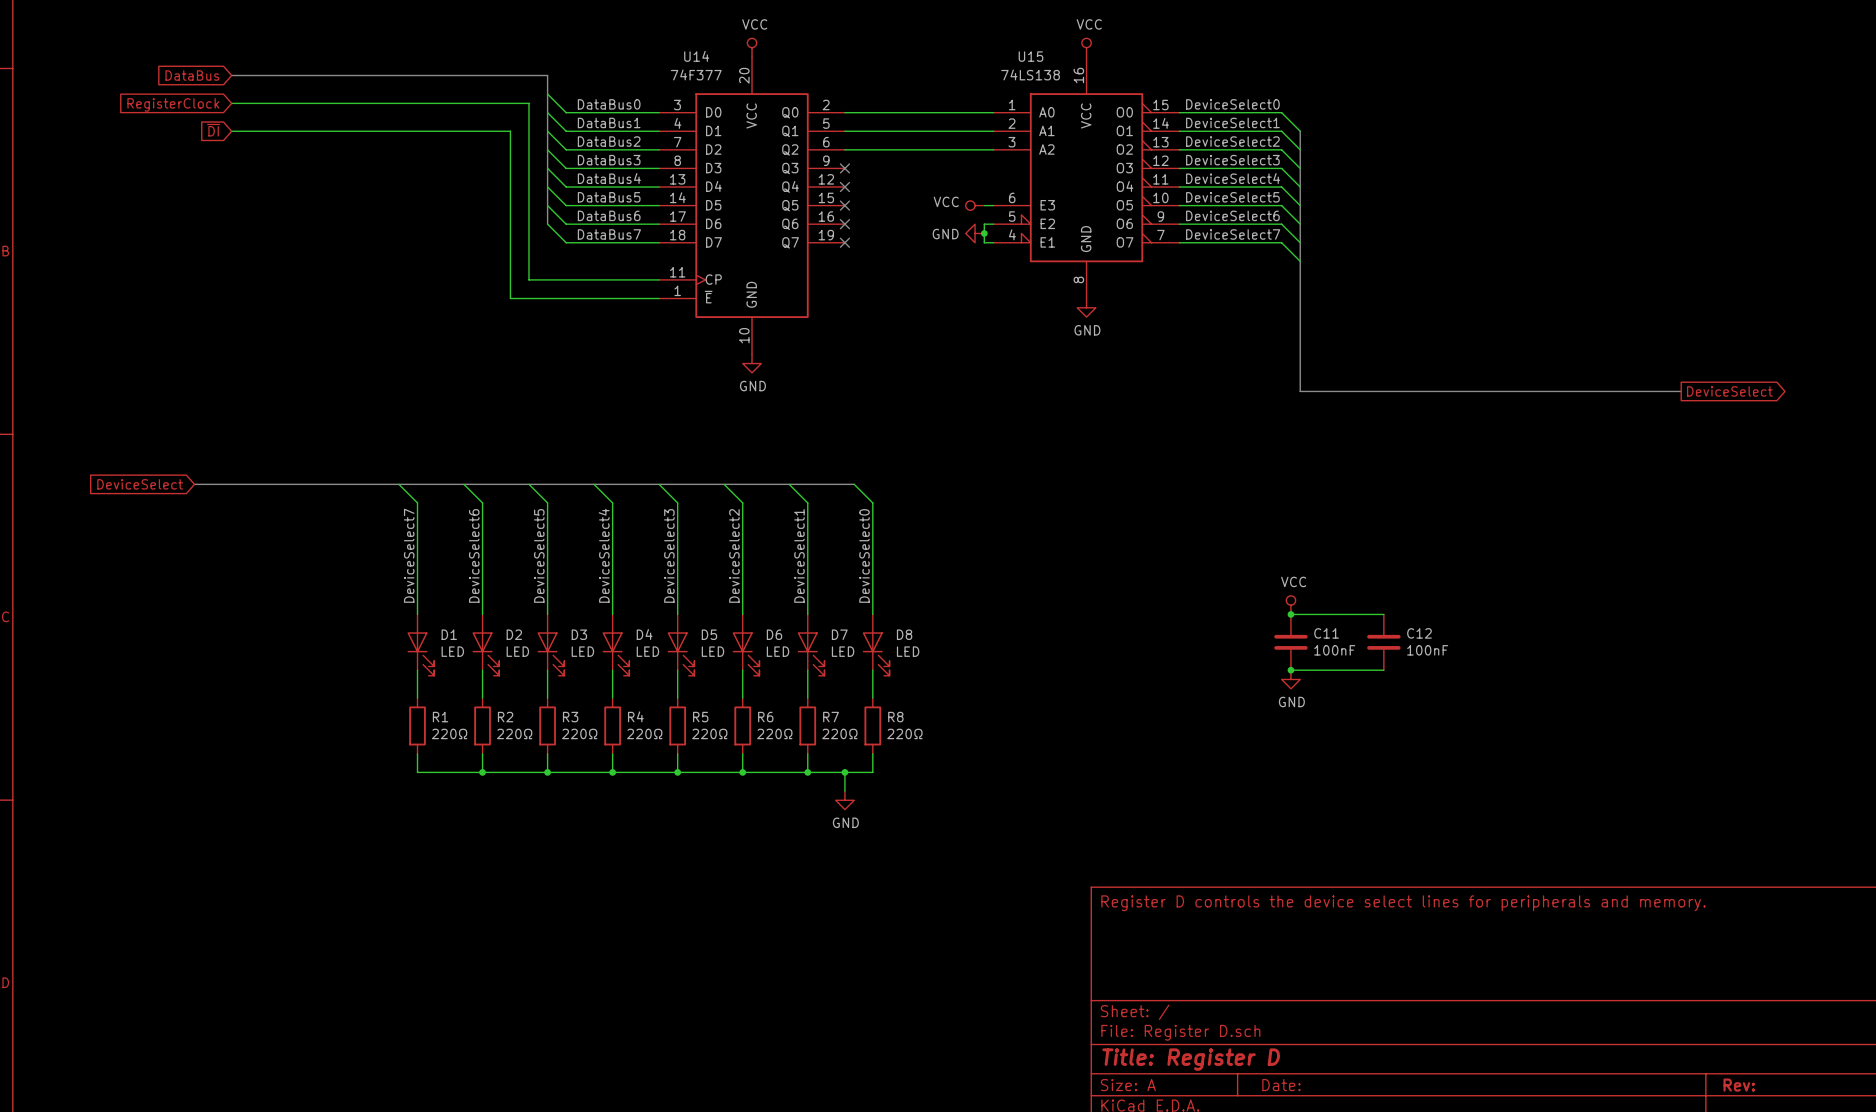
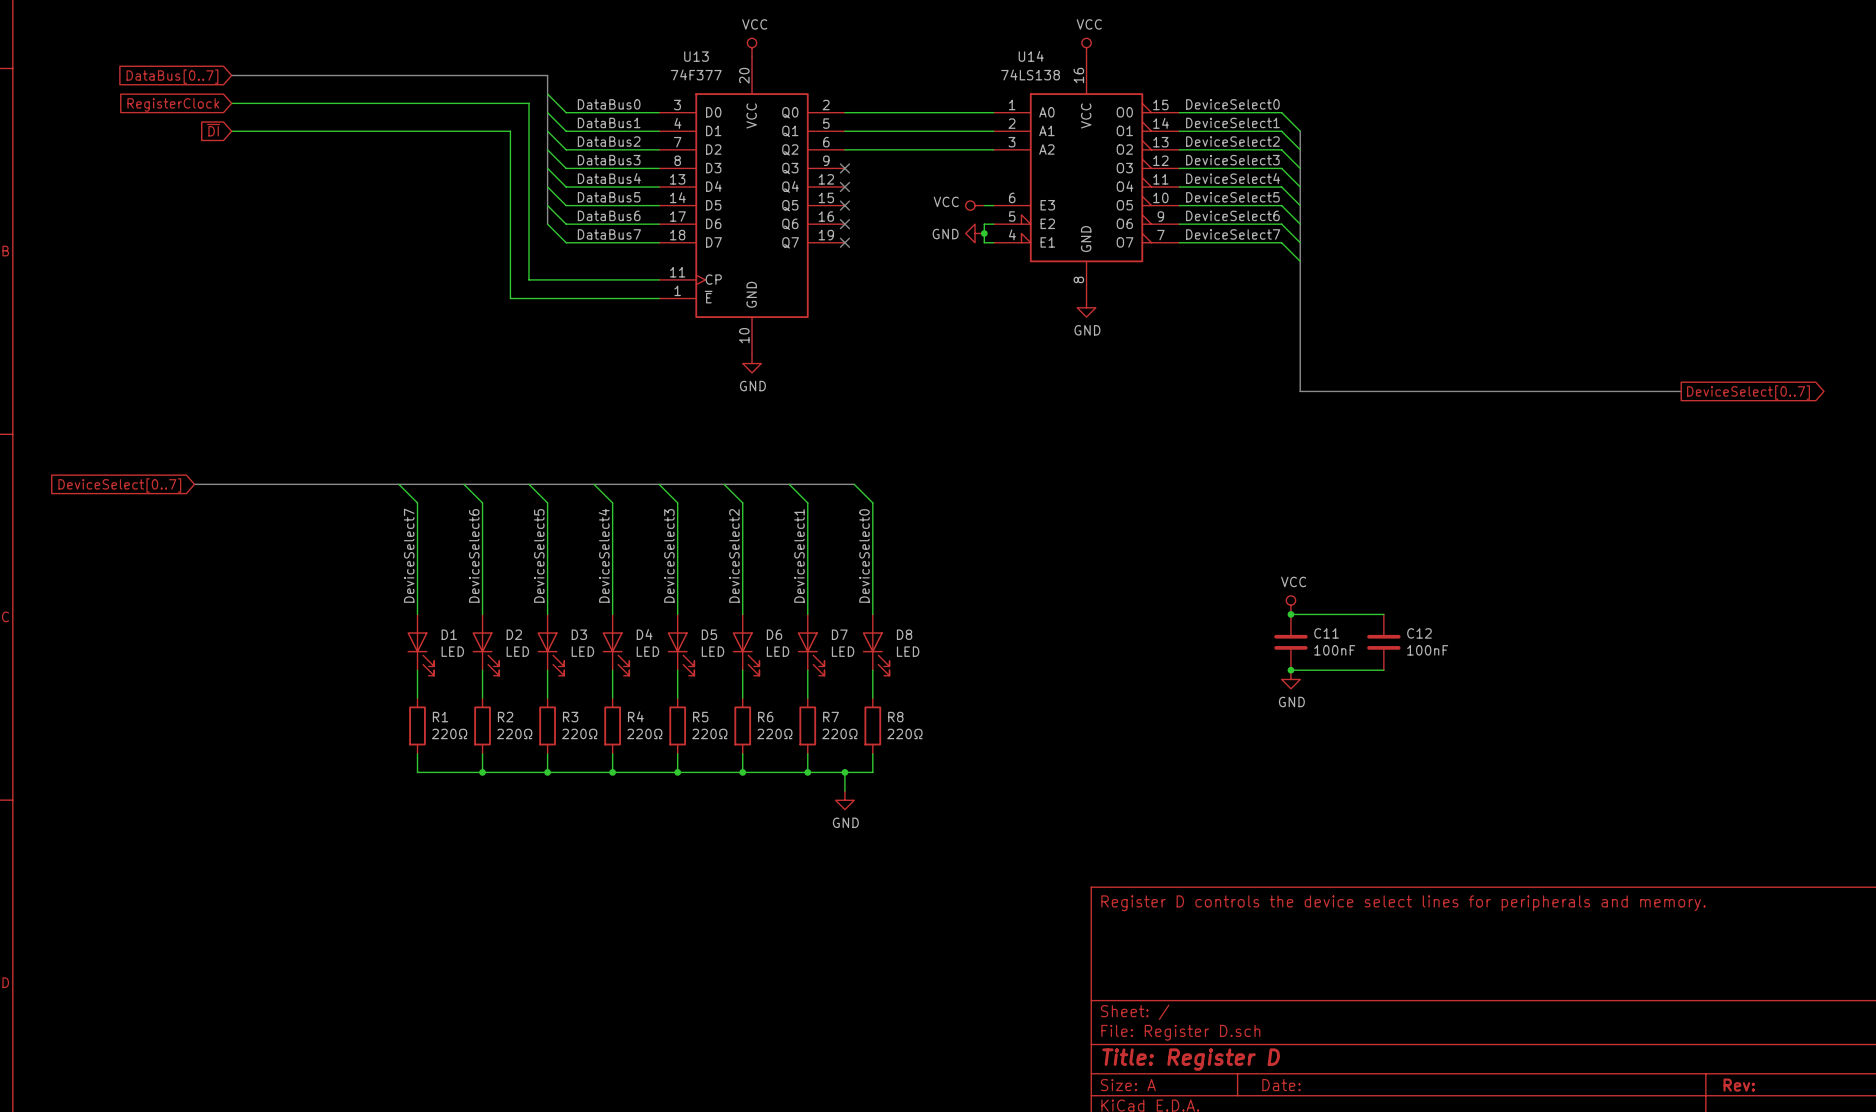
U14 name: U14 (696, 56) -> U13 (696, 56)
U15 name: U15 (1030, 56) -> U14 (1031, 56)
global label: DataBus (192, 75) -> DataBus[0..7] (172, 76)
global label: DeviceSelect (1729, 391) -> DeviceSelect[0..7] (1748, 392)
global label: DeviceSelect (140, 484) -> DeviceSelect[0..7] (119, 485)

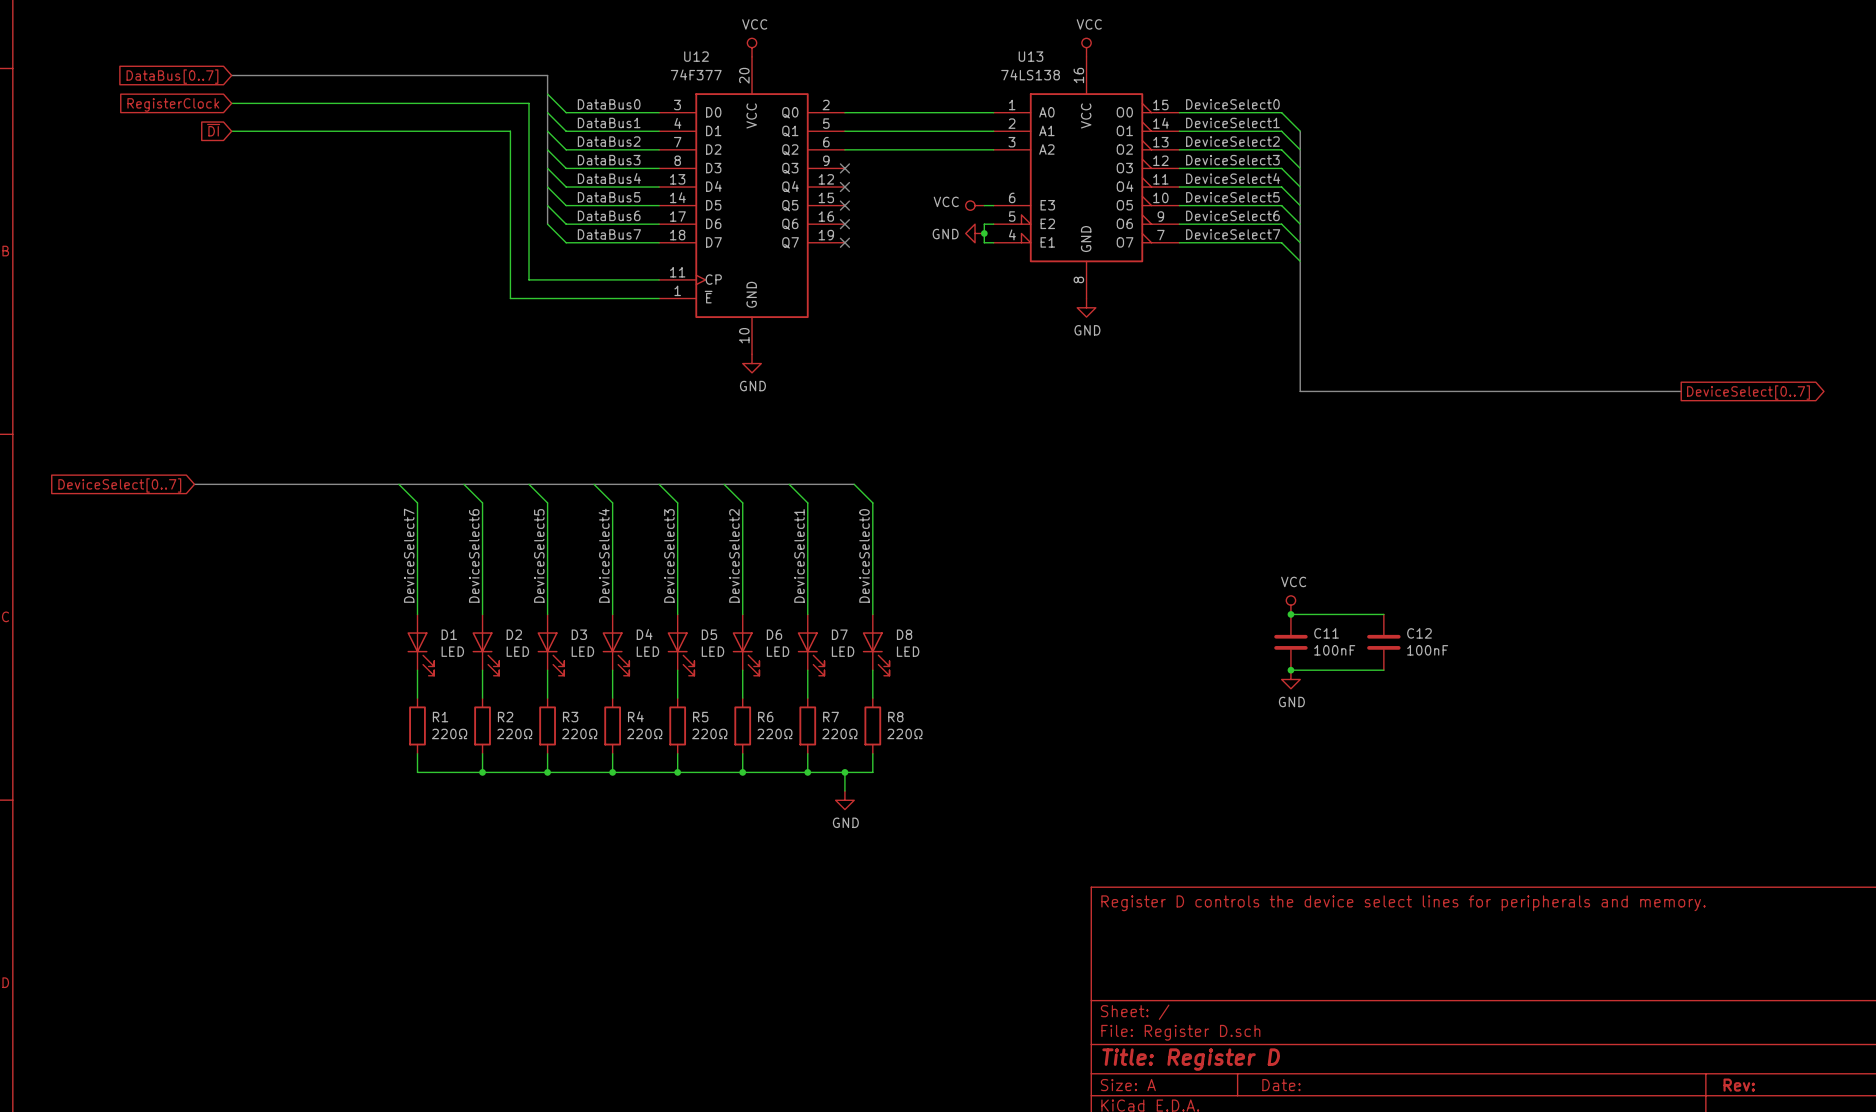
U13 name: U13 (696, 56) -> U12 (696, 56)
U14 name: U14 (1031, 56) -> U13 (1030, 56)

